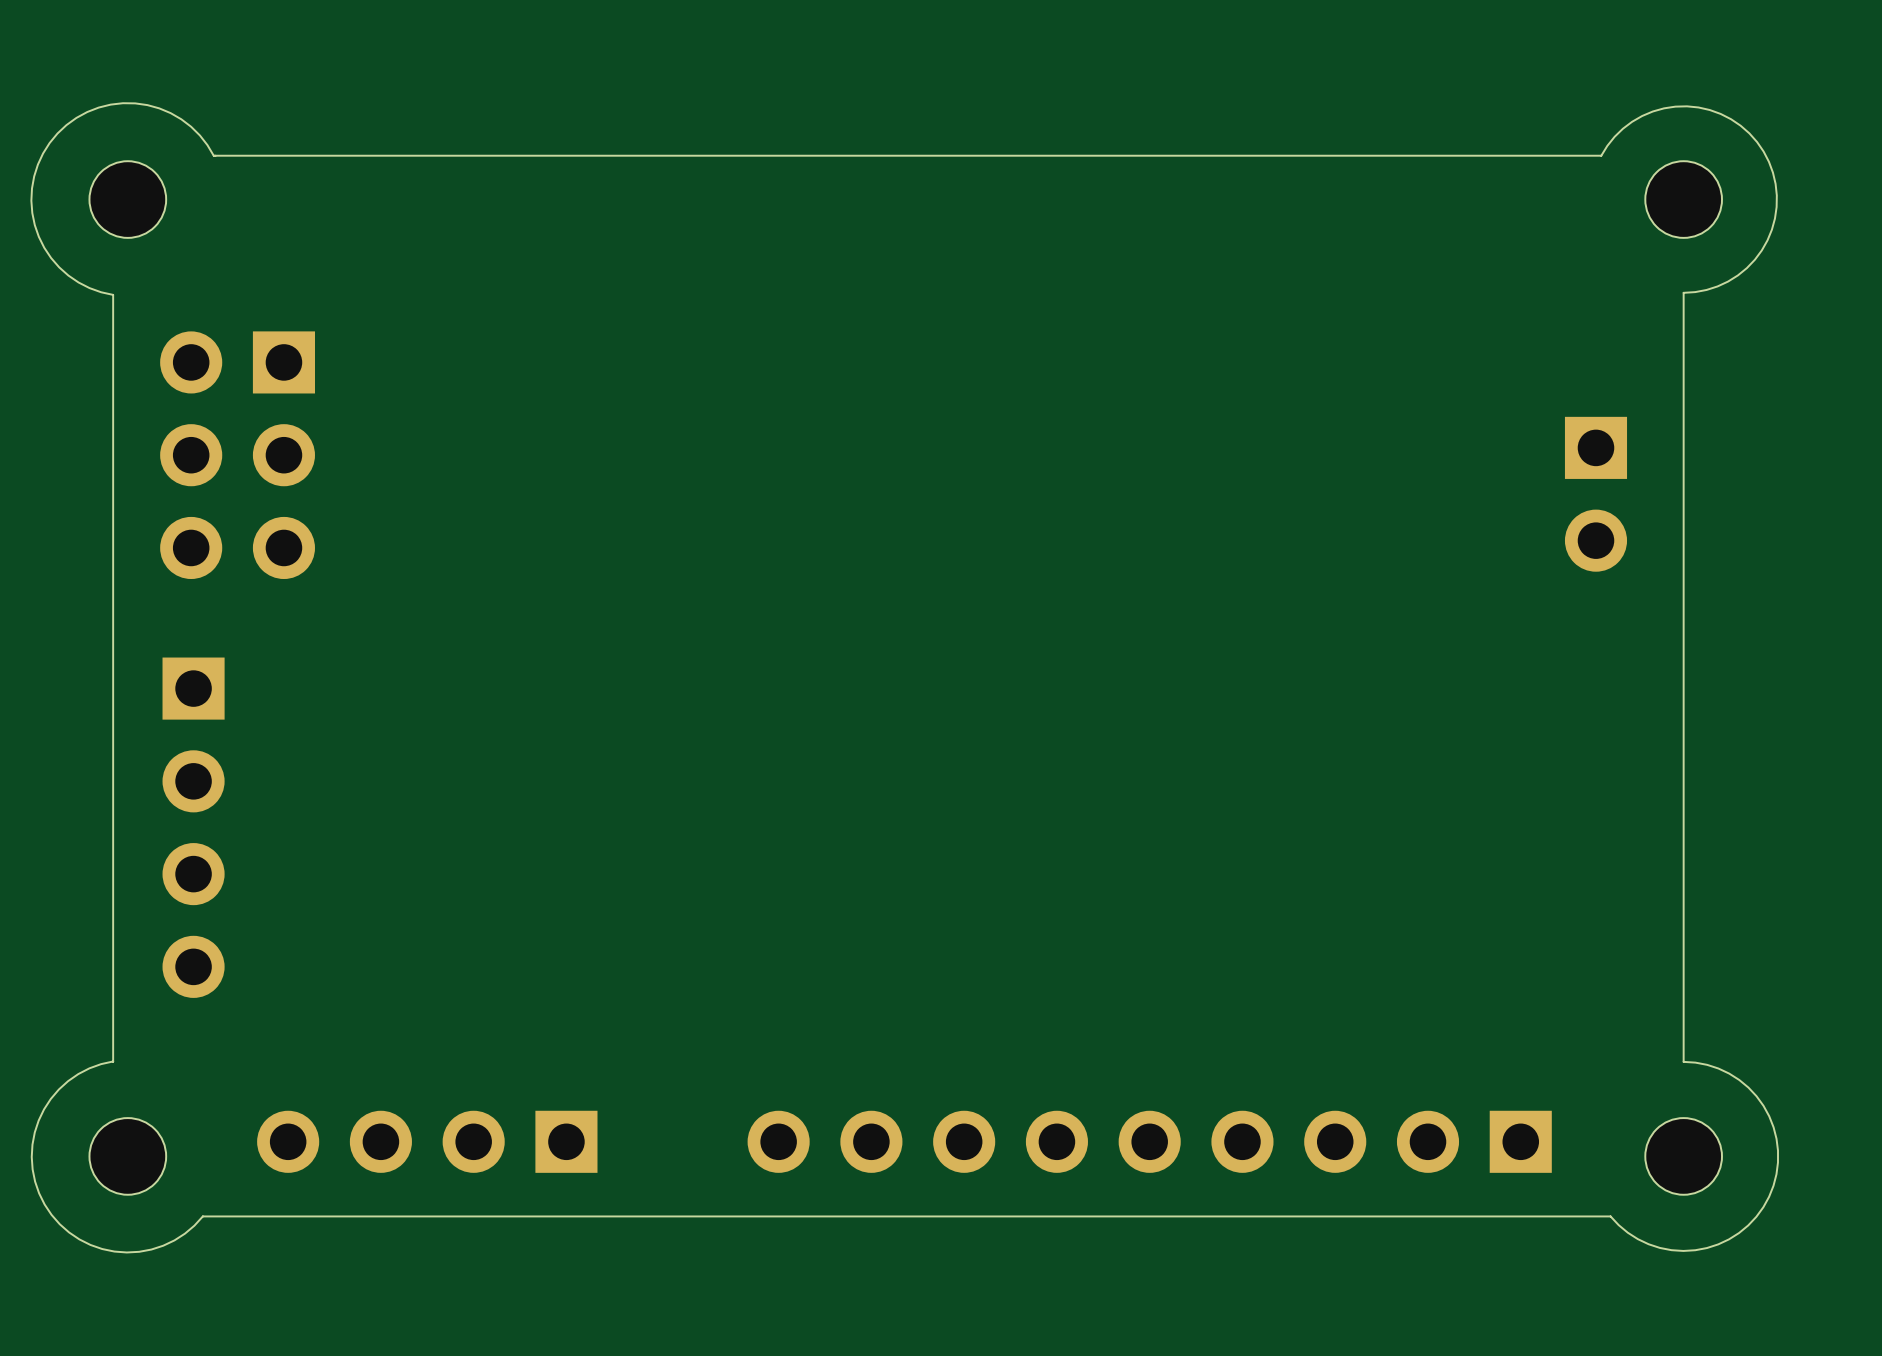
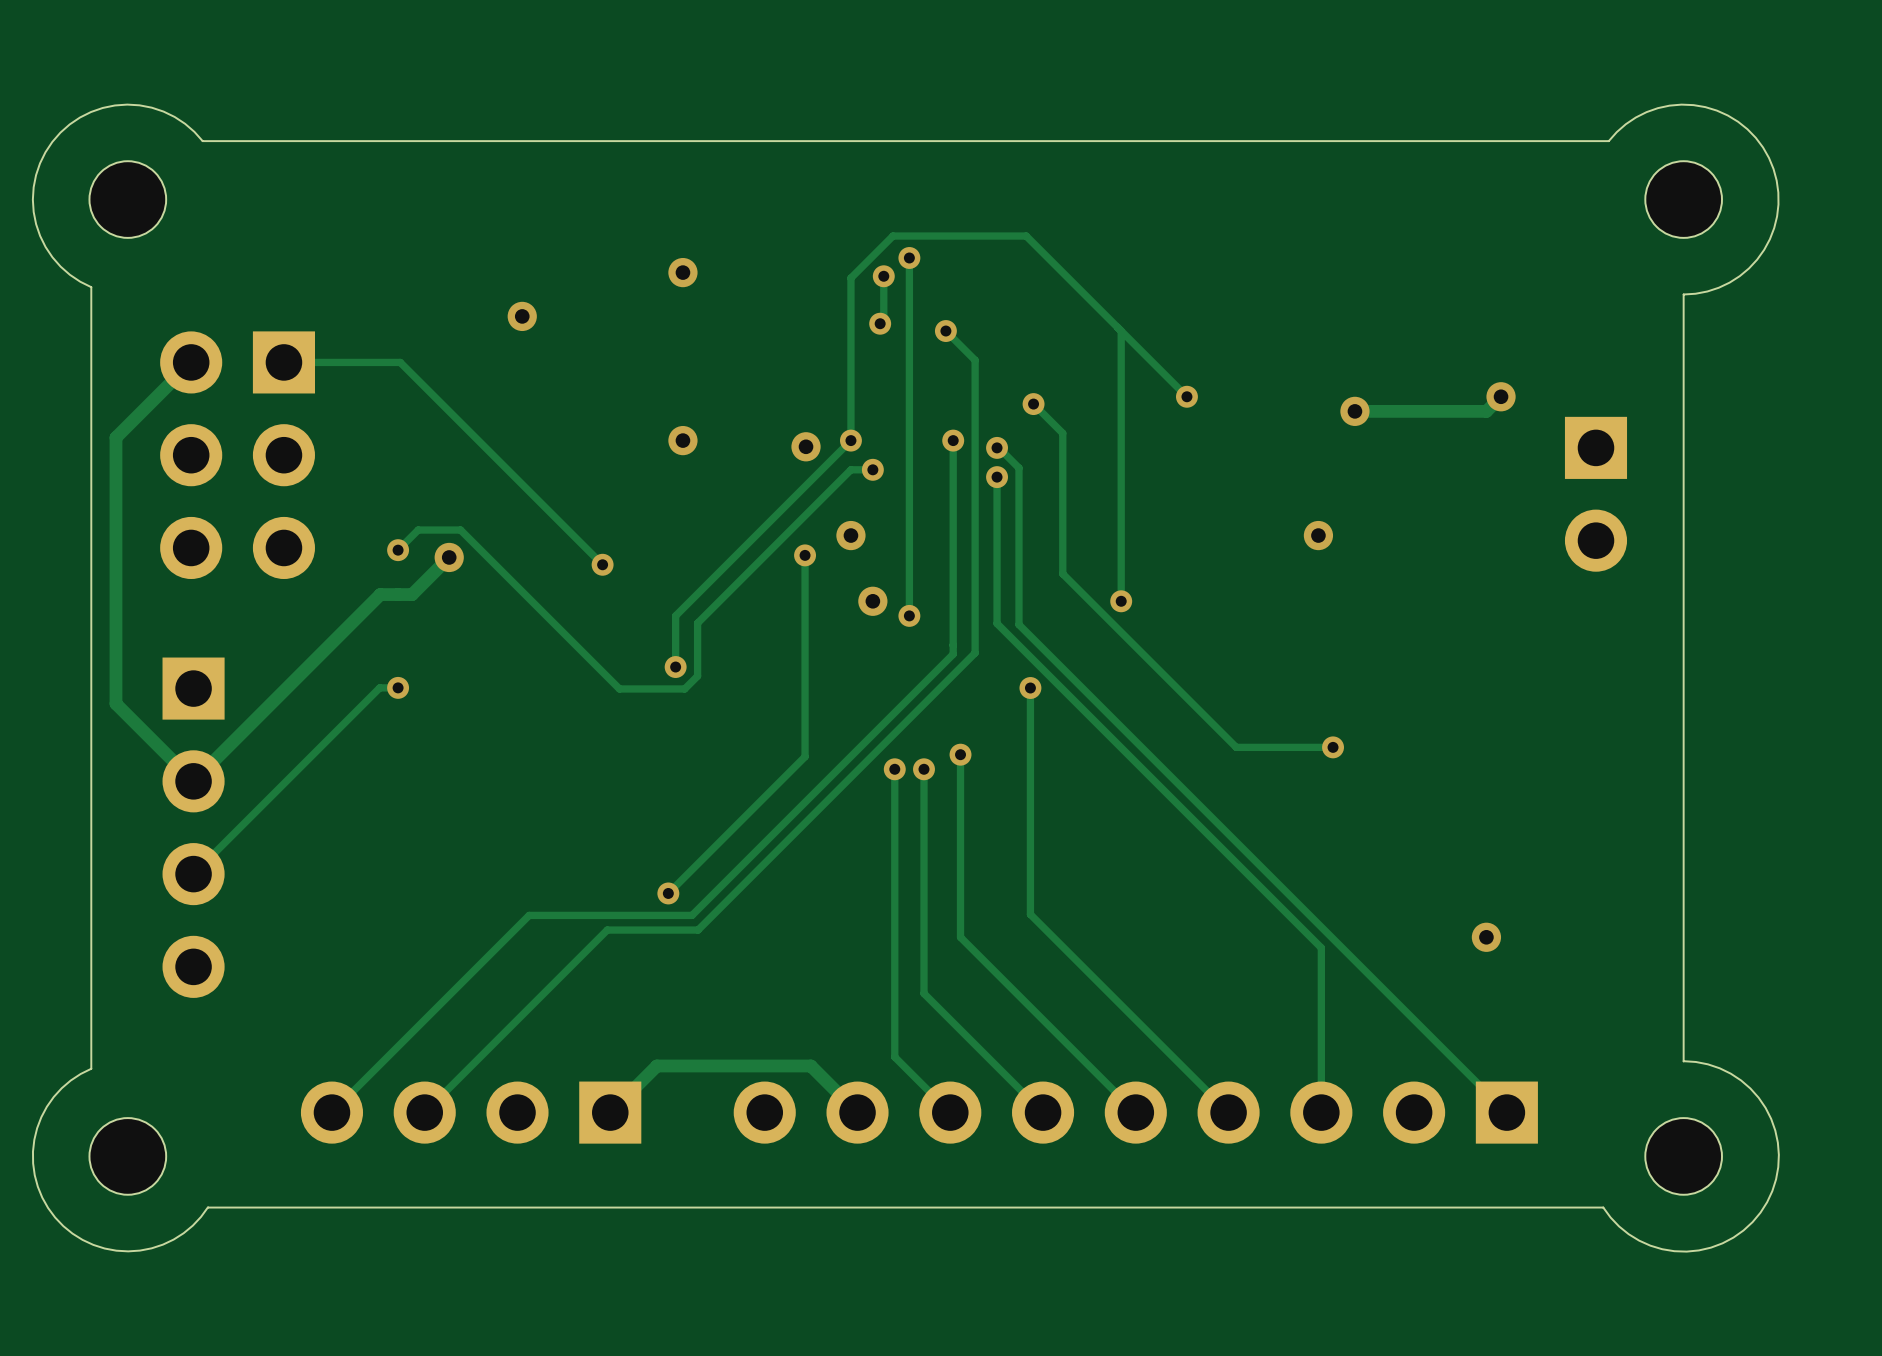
track: none -> (909, 257) (909, 615)
via: none -> (909, 257)
via: none -> (682, 272)
track: none -> (883, 276) (883, 320) (880, 323)
via: none -> (883, 276)
board edge: (1683, 294) (1683, 292) (1717, 286) (1746, 268) (1767, 240) (1776, 207) (1772, 172) (1757, 141) (1731, 119) (1698, 107) (1664, 108) (1642, 115) (1622, 128) (1601, 155) (213, 155) (207, 145) (191, 126) (181, 119) (159, 108) (147, 105) (122, 103) (110, 104) (87, 112) (66, 125) (57, 133) (43, 153) (34, 176) (31, 200) (34, 225) (44, 247) (51, 258) (59, 267) (78, 282) (89, 288) (113, 294) (113, 1061) -> (1683, 294) (1707, 291) (1718, 287) (1729, 282) (1749, 268) (1757, 259) (1769, 239) (1777, 216) (1778, 204) (1778, 192) (1773, 169) (1768, 157) (1755, 137) (1747, 129) (1727, 115) (1716, 110) (1693, 105) (1669, 105) (1646, 112) (1625, 124) (1608, 141) (202, 141) (185, 123) (174, 116) (163, 111) (139, 105) (114, 105) (102, 107) (79, 117) (60, 132) (45, 152) (36, 175) (32, 199) (36, 224) (45, 247) (60, 266) (69, 274) (91, 287) (91, 1068) (70, 1080) (46, 1106) (37, 1128) (33, 1163) (42, 1197) (55, 1217) (72, 1233) (104, 1248) (128, 1251) (162, 1244) (192, 1225) (207, 1207)
via: none -> (522, 316)
via: none -> (880, 323)
track: none -> (945, 331) (975, 360) (975, 653) (698, 930) (607, 930) (424, 1112)
via: none -> (945, 331)
track: none -> (1121, 331) (1121, 601)
track: none -> (191, 362) (115, 437) (115, 703) (193, 781) (380, 594) (412, 594) (449, 557)
track: none -> (283, 362) (400, 362) (602, 564)
track: none -> (1186, 396) (1026, 236) (892, 236) (850, 278) (850, 440) (675, 615) (675, 667)
via: none -> (1186, 396)
track: none -> (1501, 396) (1486, 411) (1354, 411)
via: none -> (1501, 396)
track: none -> (1033, 404) (1062, 433) (1062, 573) (1236, 747) (1333, 747)
via: none -> (1033, 404)
via: none -> (1354, 411)
via: none -> (682, 440)
via: none -> (850, 440)
track: none -> (953, 440) (953, 654) (692, 915) (529, 915) (331, 1112)
via: none -> (953, 440)
via: none -> (806, 446)
track: none -> (997, 447) (1018, 468) (1018, 624) (1506, 1112)
via: none -> (997, 447)
track: none -> (872, 469) (850, 469) (697, 623) (697, 676) (684, 688) (619, 688) (460, 530) (418, 530) (398, 550)
via: none -> (872, 469)
track: none -> (997, 477) (997, 623) (1321, 947) (1321, 1112)
via: none -> (997, 477)
via: none -> (850, 535)
via: none -> (1318, 535)
via: none -> (398, 550)
track: none -> (805, 555) (805, 756) (668, 893)
via: none -> (805, 555)
via: none -> (449, 557)
via: none -> (602, 564)
via: none -> (872, 601)
via: none -> (1121, 601)
via: none -> (909, 615)
via: none -> (675, 667)
track: none -> (398, 687) (379, 687) (193, 874)
via: none -> (398, 687)
track: none -> (1030, 688) (1030, 914) (1228, 1112)
via: none -> (1030, 688)
via: none -> (1333, 747)
track: none -> (960, 754) (960, 937) (1135, 1112)
via: none -> (960, 754)
track: none -> (894, 769) (894, 1057) (950, 1112)
via: none -> (894, 769)
track: none -> (923, 769) (923, 993) (1043, 1112)
via: none -> (923, 769)
via: none -> (668, 893)
via: none -> (1486, 937)
board edge: (113, 1061) (101, 1064) (78, 1074) (58, 1089) (50, 1098) (44, 1109) (34, 1132) (32, 1144) (32, 1169) (35, 1181) (44, 1204) (59, 1224) (69, 1232) (90, 1244) (114, 1251) (126, 1252) (151, 1249) (163, 1245) (184, 1233) (202, 1216) (1610, 1216) (1627, 1232) (1648, 1244) (1671, 1250) (1695, 1250) (1729, 1239) (1756, 1216) (1773, 1185) (1778, 1150) (1769, 1116) (1748, 1087) (1718, 1068) (1683, 1061) -> (208, 1207) (1603, 1207) (1610, 1217) (1628, 1234) (1650, 1245) (1674, 1251) (1698, 1250) (1722, 1243) (1733, 1237) (1752, 1222) (1767, 1202) (1772, 1191) (1776, 1179) (1778, 1154) (1775, 1130) (1771, 1118) (1758, 1097) (1750, 1088) (1741, 1080) (1719, 1068) (1695, 1061) (1683, 1061)
track: none -> (857, 1112) (810, 1065) (656, 1065) (610, 1112)
part position: (427, 1141) -> (471, 1112)
part position: (1149, 1141) -> (1135, 1112)

